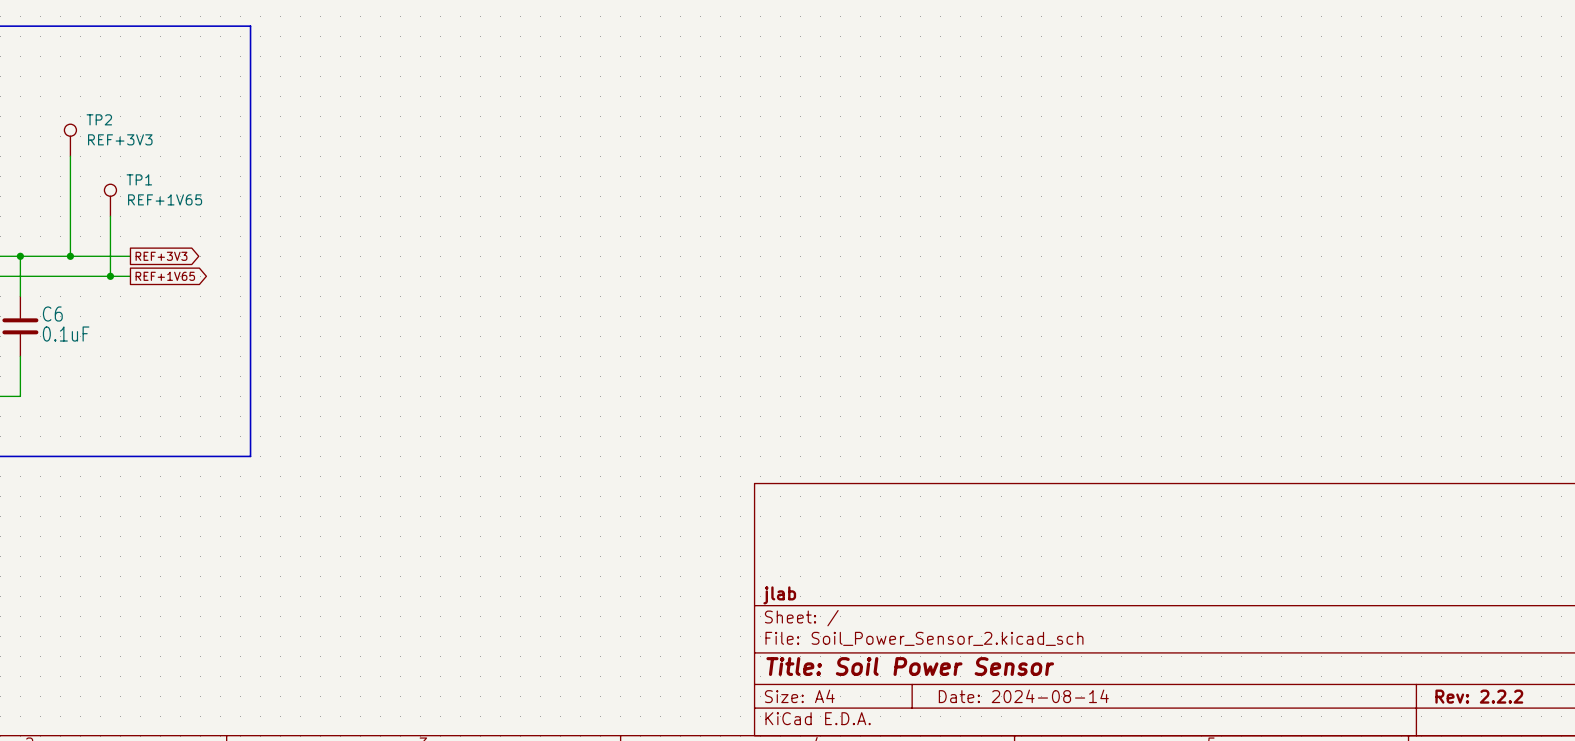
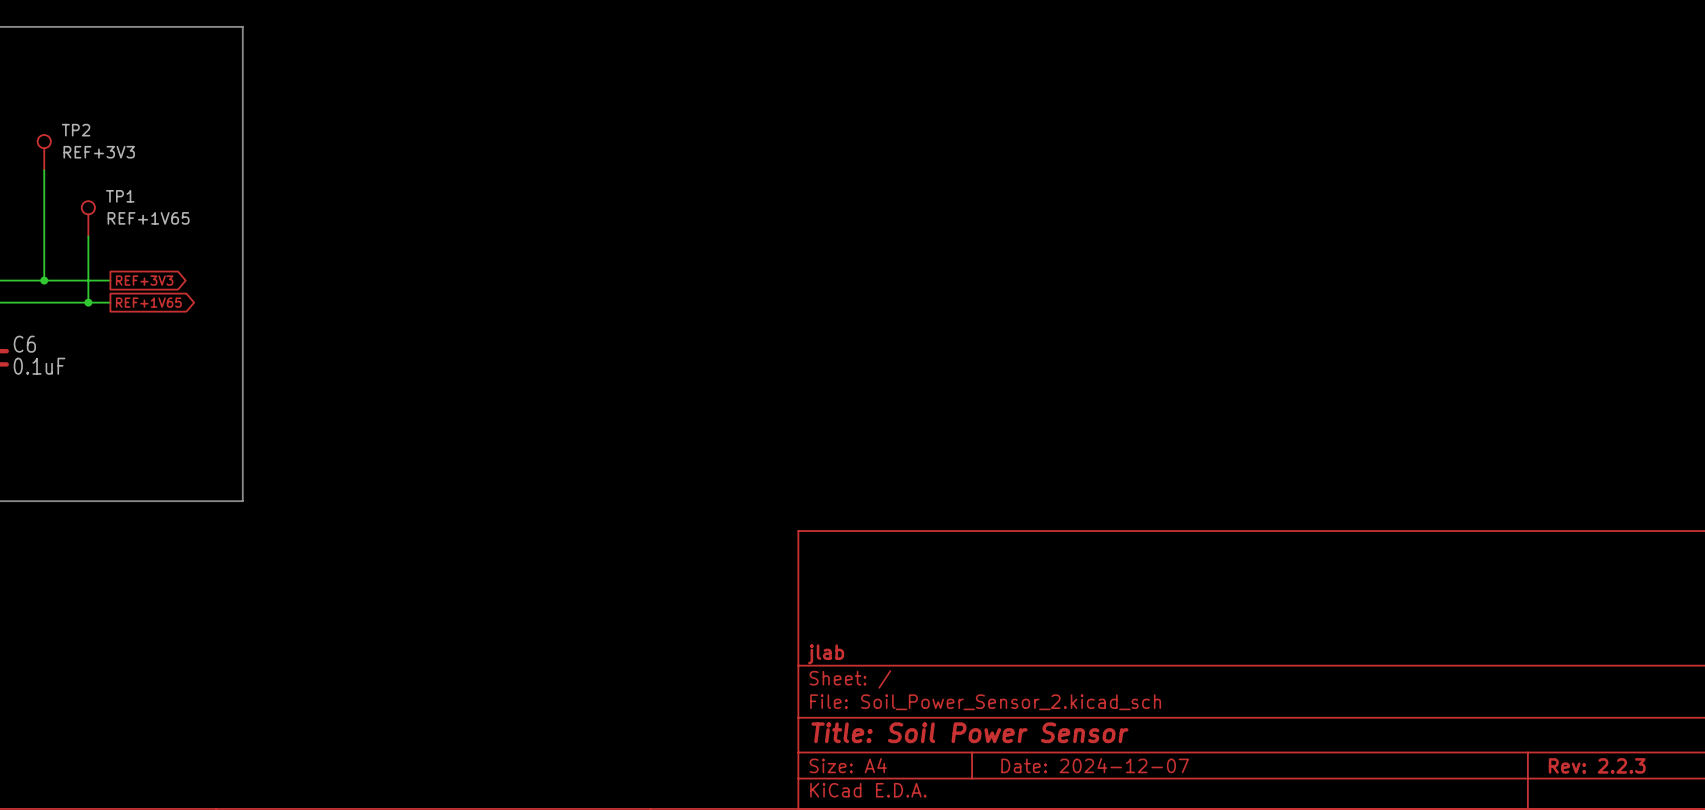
title block: Date: 2024-08-14 (1023, 696) -> Date: 2024-12-07 (1095, 765)
title block: Rev: 2.2.2 (1479, 696) -> Rev: 2.2.3 (1597, 765)

